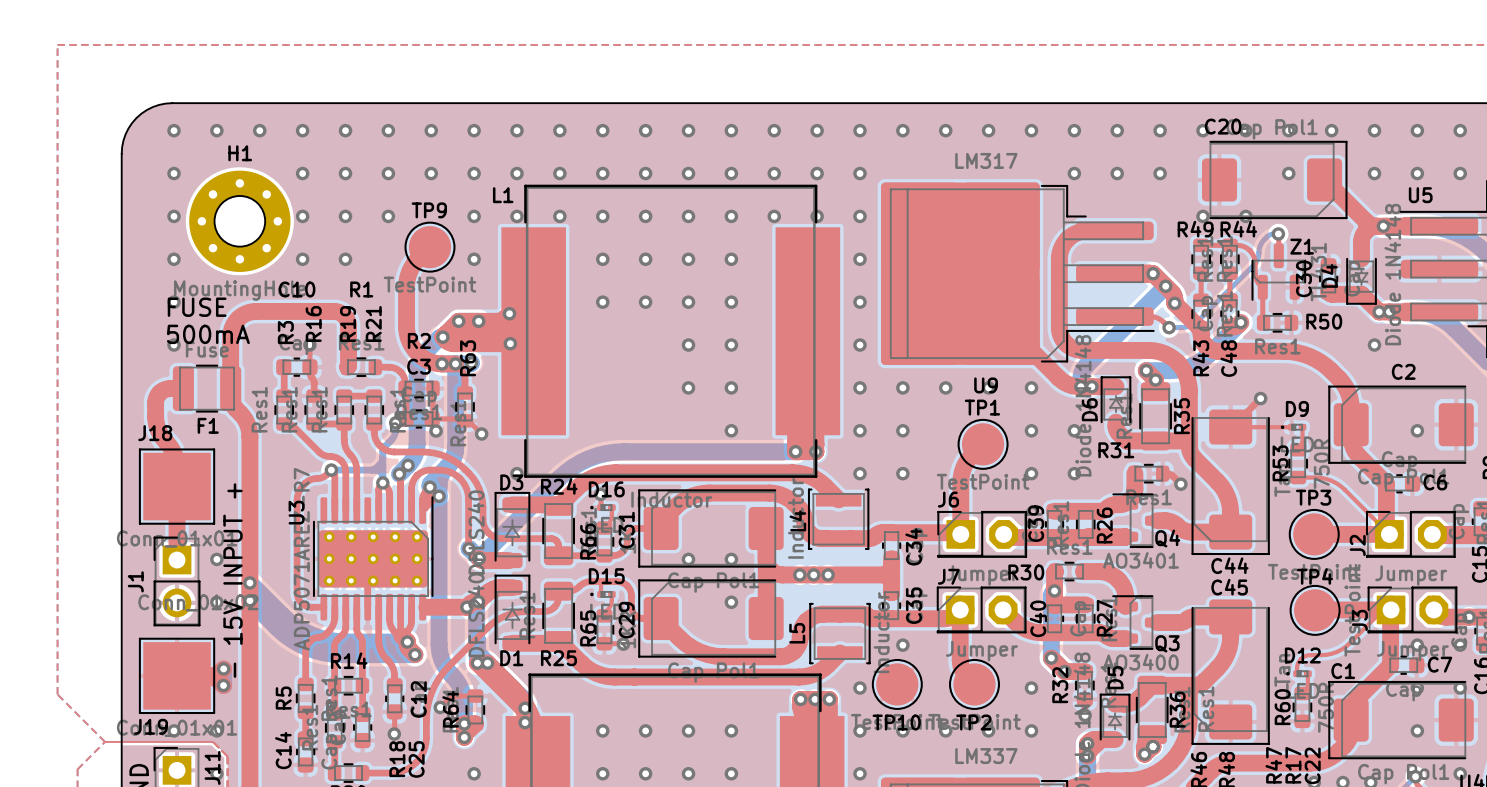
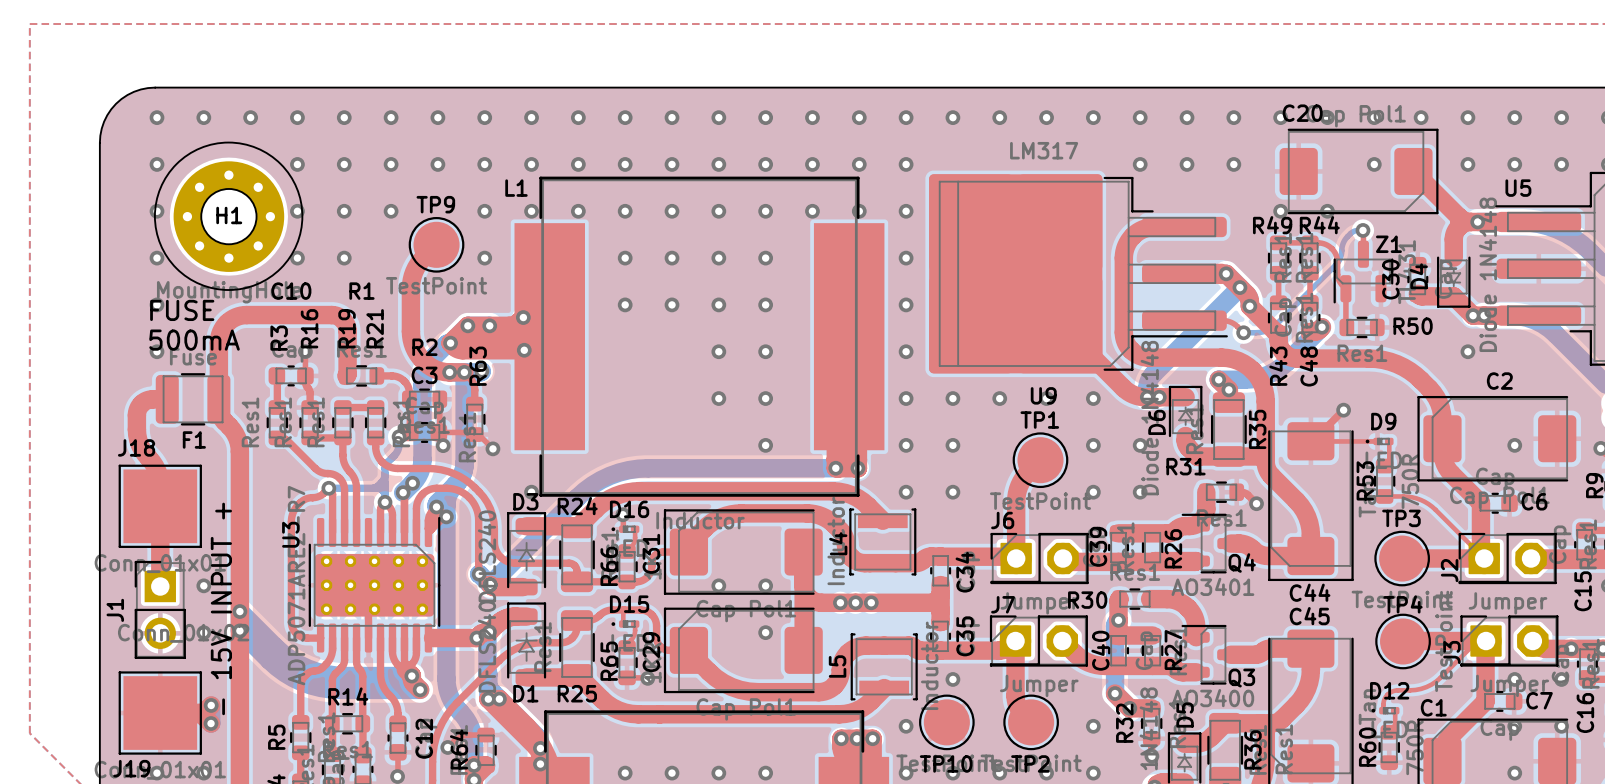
drawing: none -> [154, 141, 304, 291]
H1 name position: H1 (240, 153) -> H1 (229, 215)

